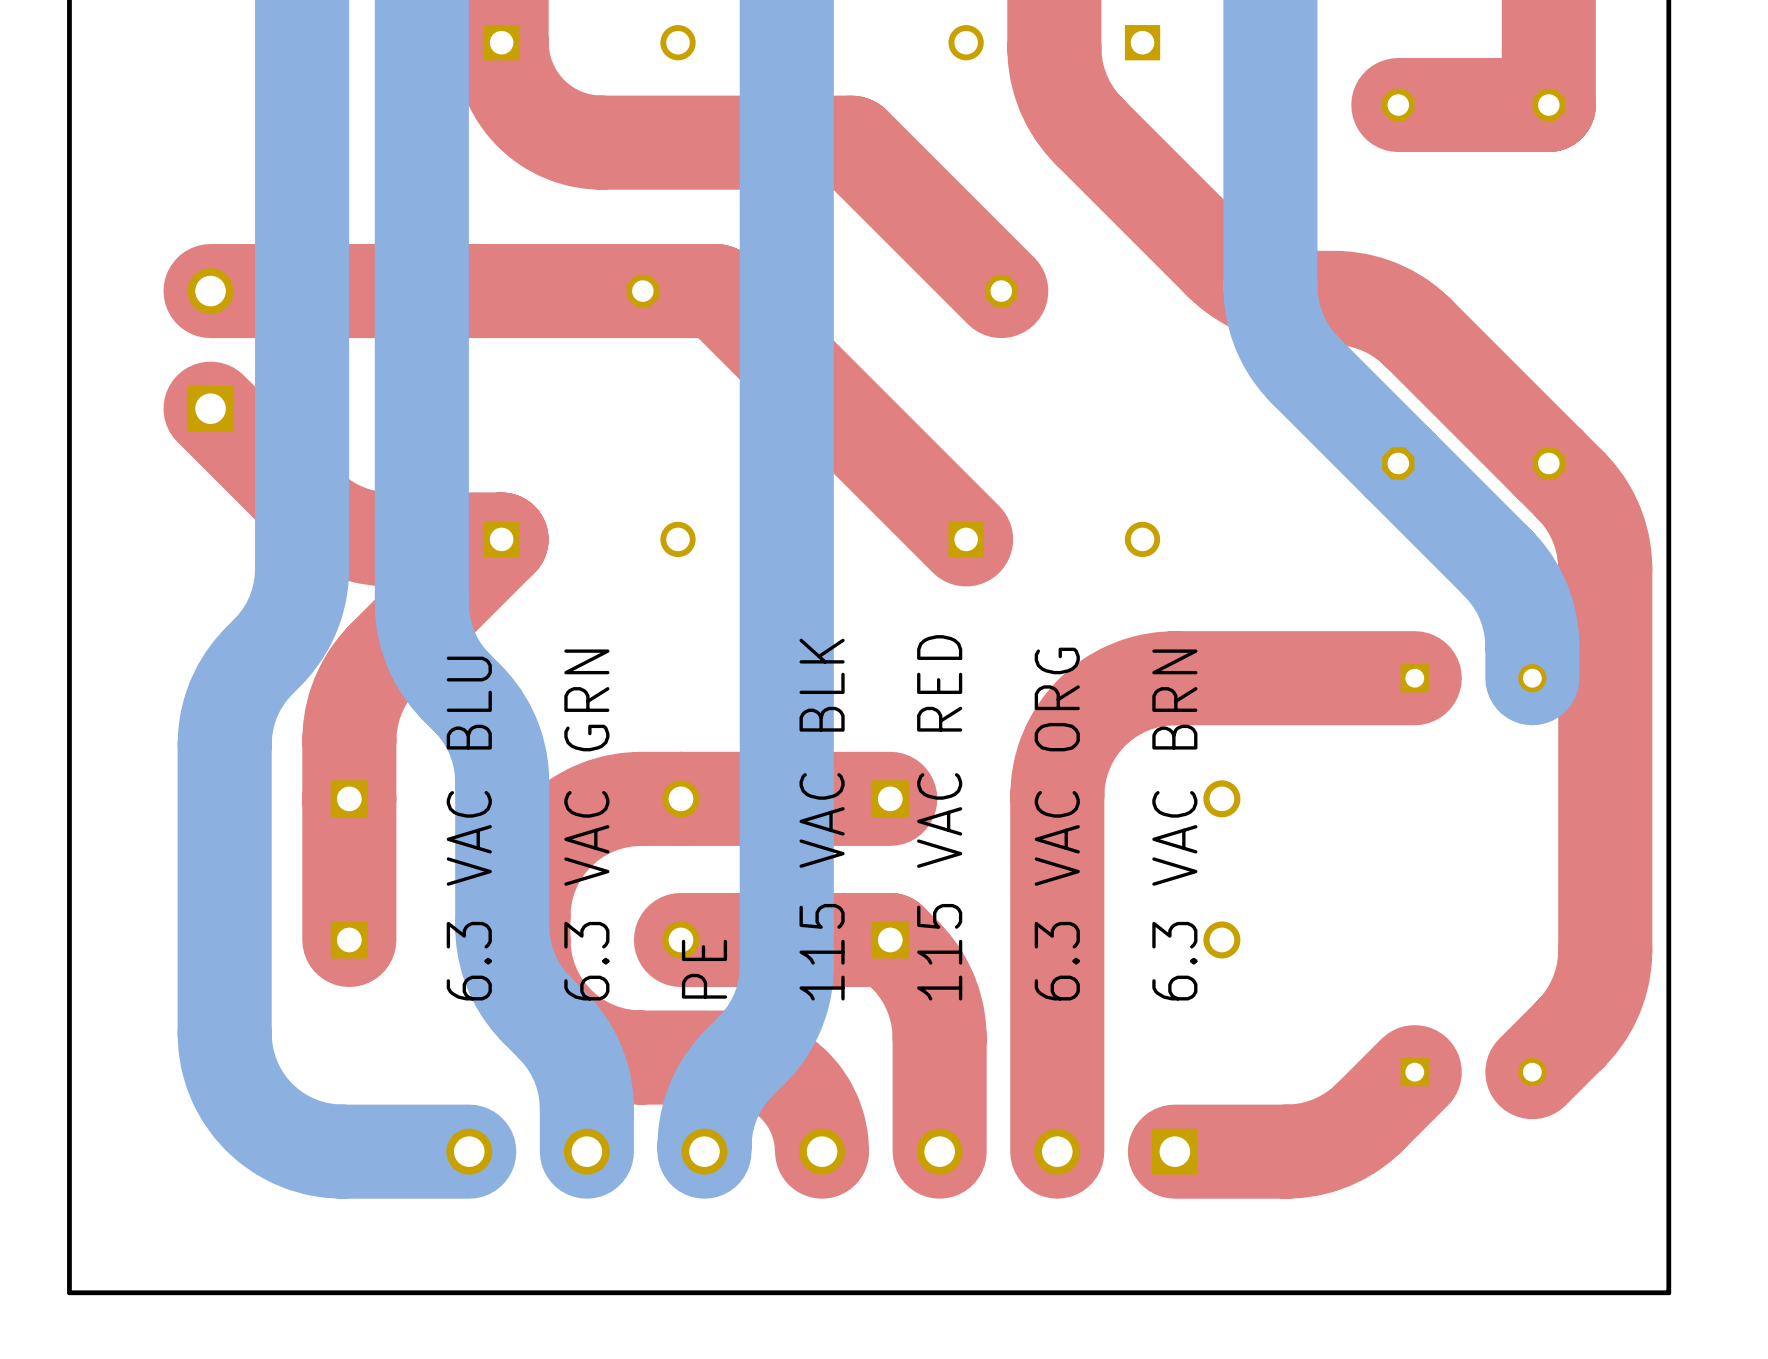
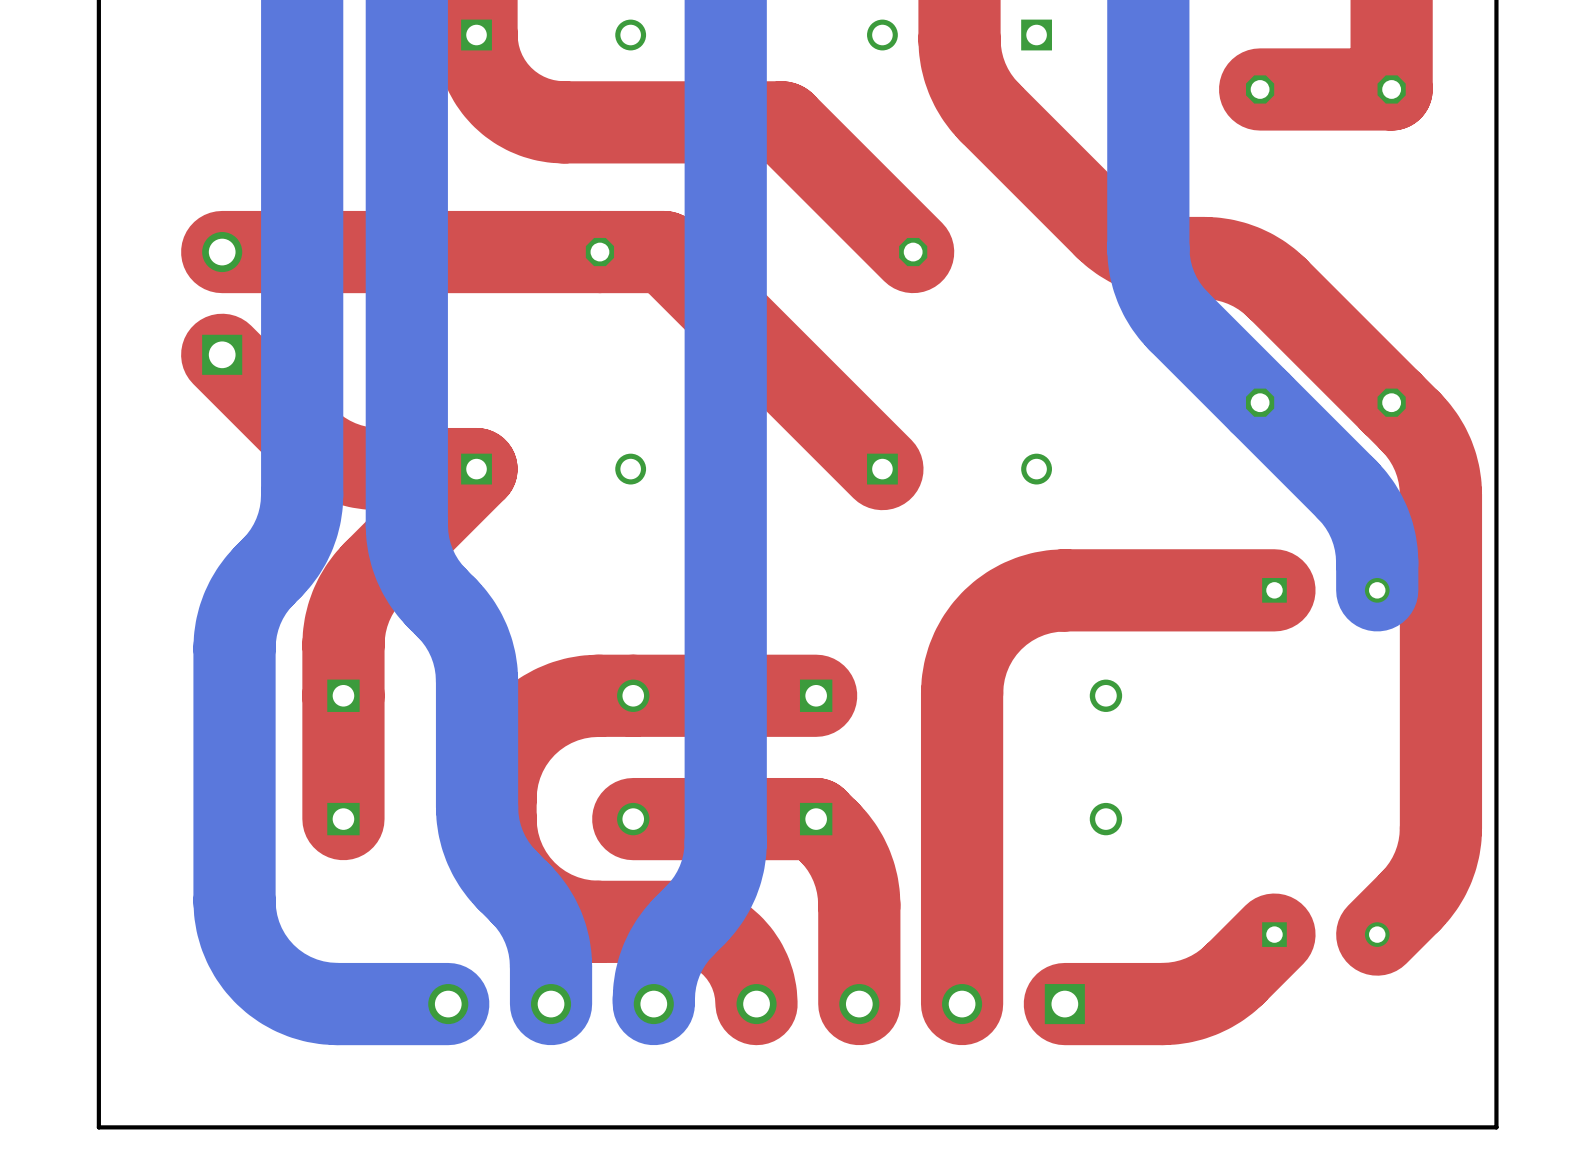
text: 115 VAC RED (939, 817) -> none
text: 115 VAC BLK (822, 819) -> none
text: 6.3 VAC GRN (586, 824) -> none
text: 6.3 VAC ORG (1057, 824) -> none
text: 6.3 VAC BRN (1174, 824) -> none
text: 6.3 VAC BLU (469, 828) -> none
text: PE (704, 969) -> none

